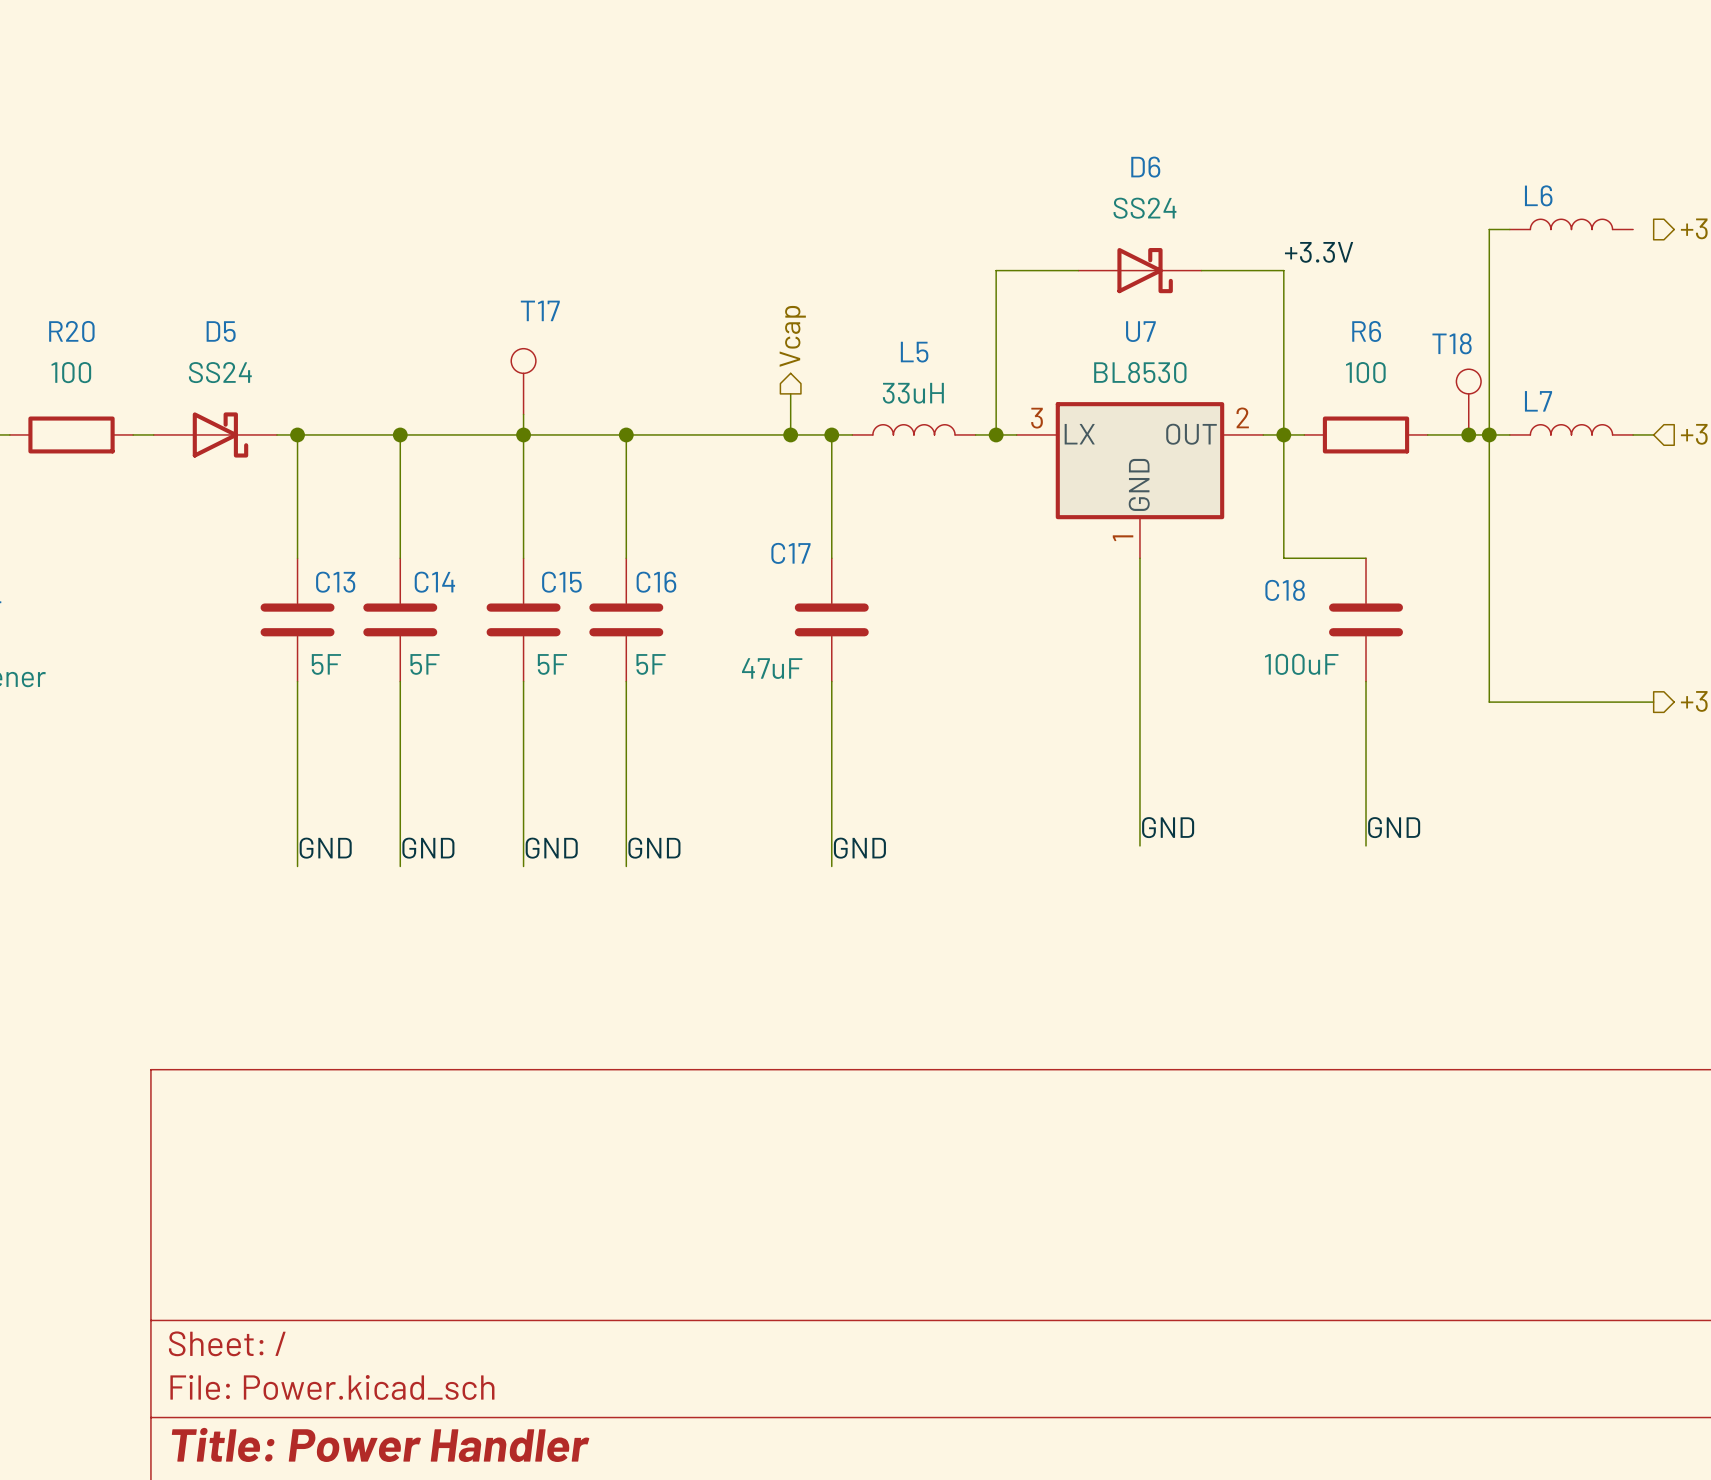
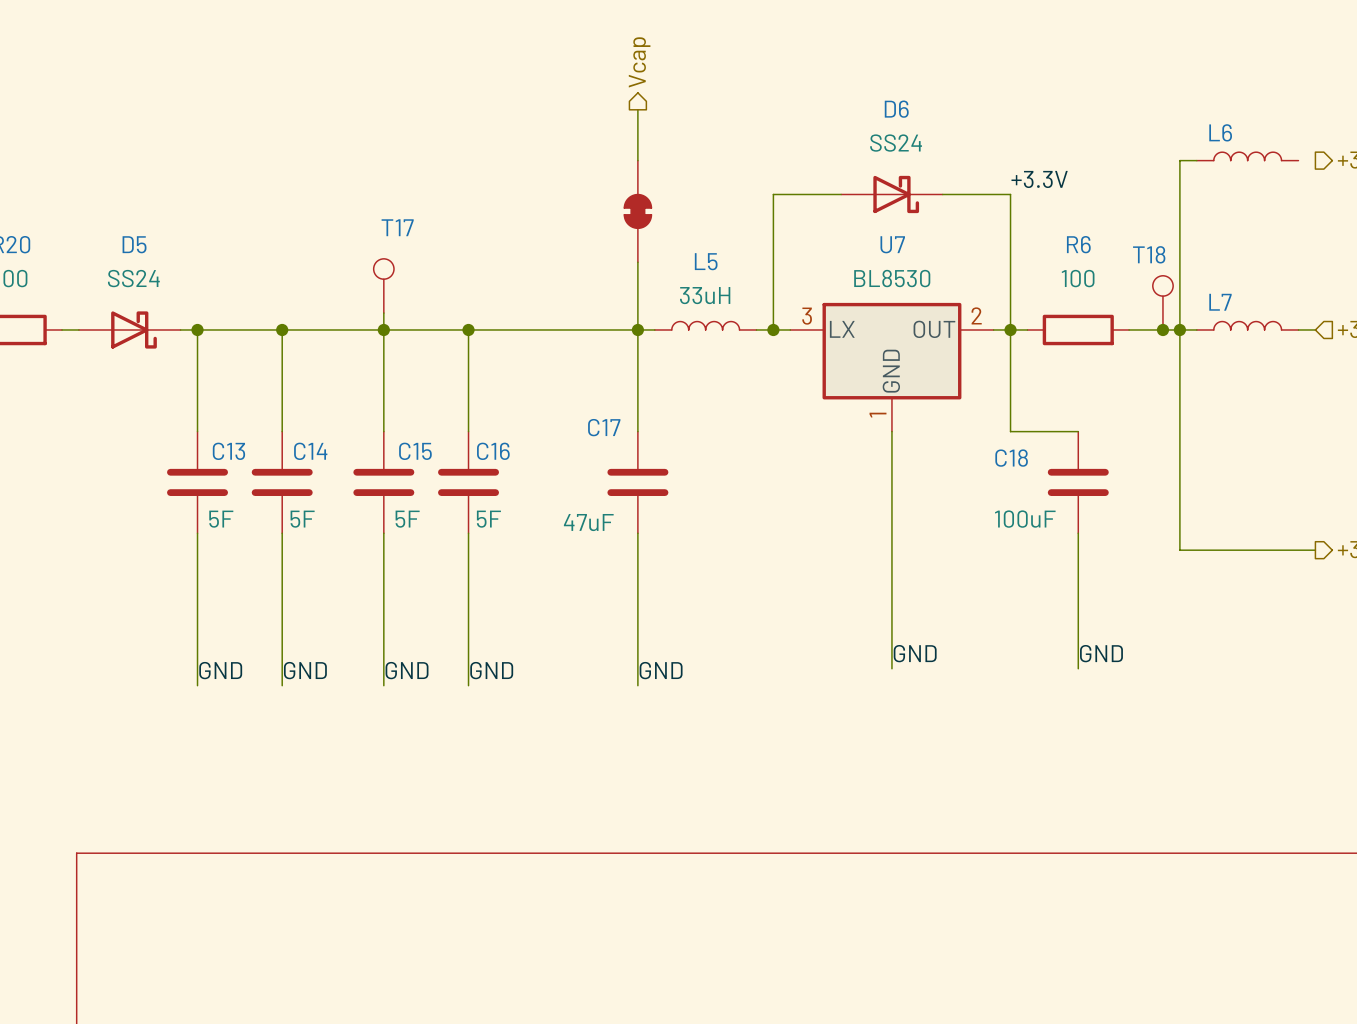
wire: none -> (637, 109) (637, 160)
part: none -> (637, 211)
hierarchical label position: Vcap (792, 336) -> Vcap (639, 62)
wire: none -> (637, 262) (637, 329)
wire: (790, 393) (790, 434) -> none
junction: (790, 434) -> none

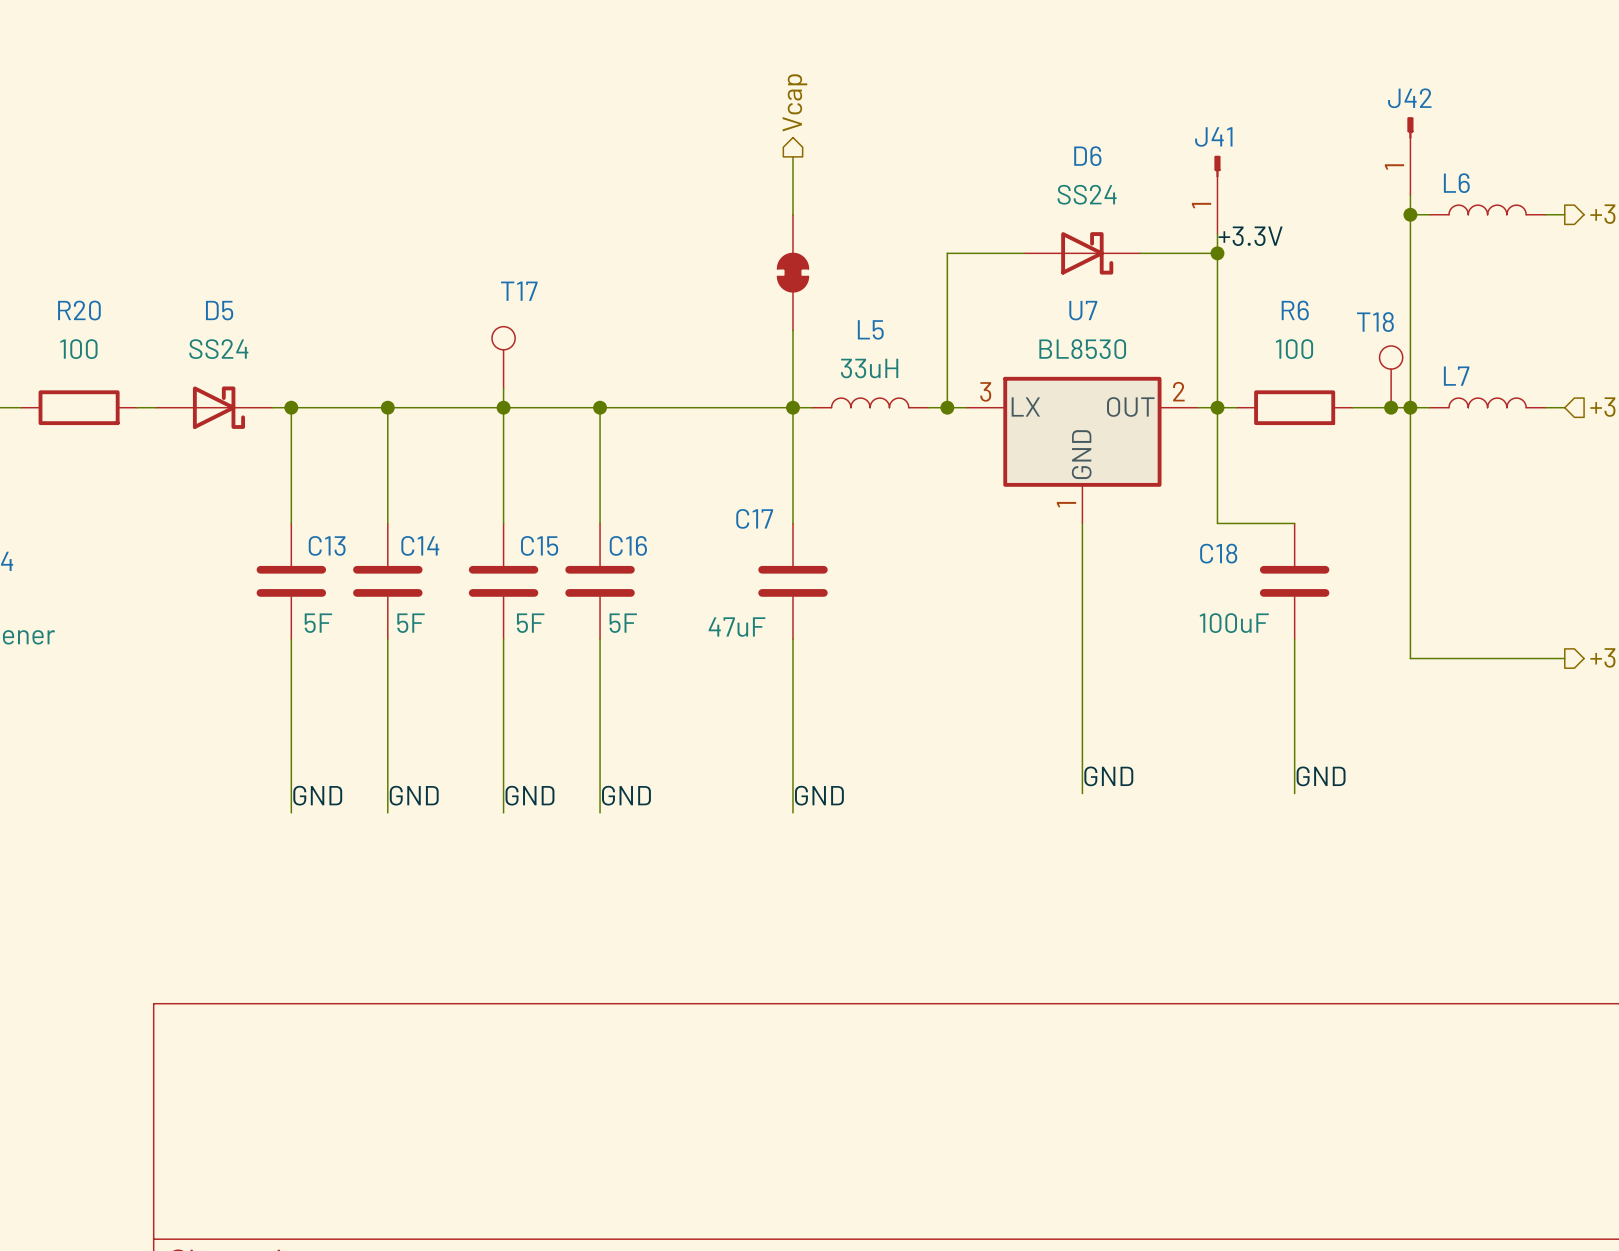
J42: none -> (1410, 156)
J41: none -> (1217, 194)
wire: none -> (1410, 195) (1410, 214)
junction: none -> (1410, 214)
wire: none -> (1545, 214) (1564, 214)
wire: none -> (1217, 234) (1217, 253)
junction: none -> (1217, 253)

